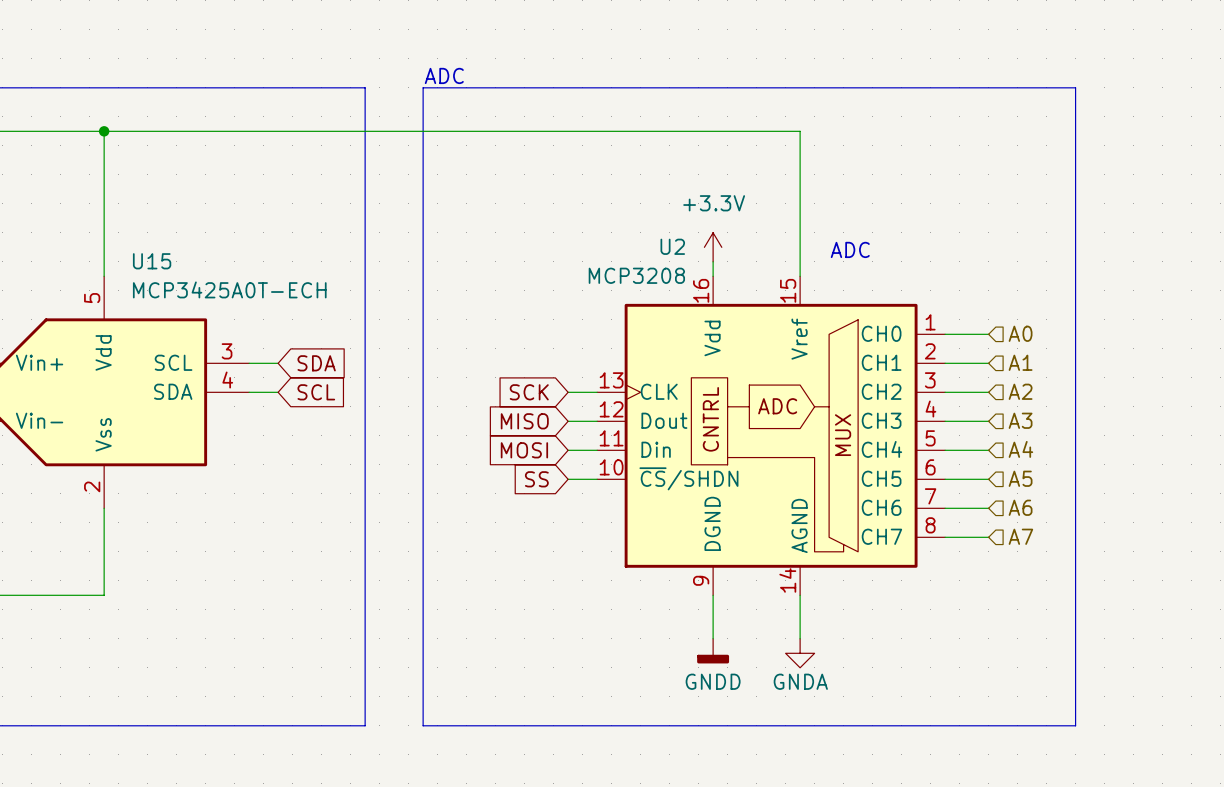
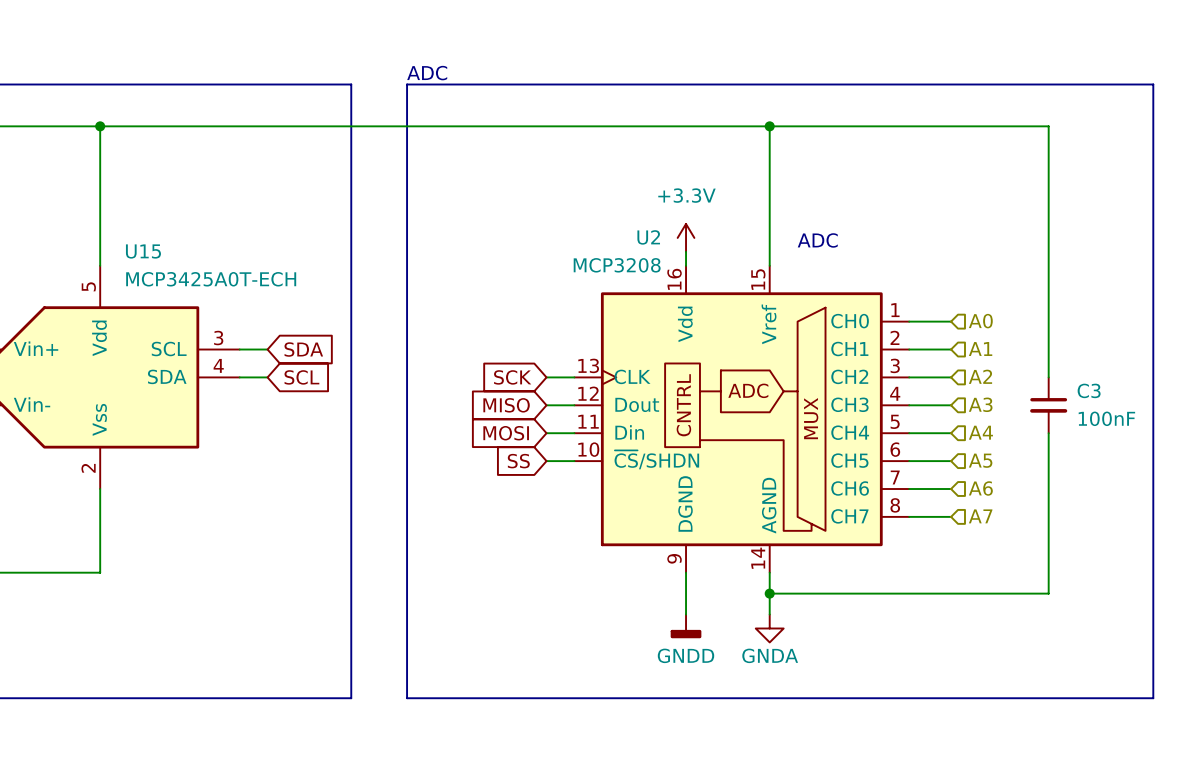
line: (1075, 87) (1075, 725) -> (1034, 84) (1153, 84) (1153, 698) (1034, 698)
wire: none -> (769, 126) (1048, 126) (1048, 377)
junction: none -> (769, 126)
C3: none -> 100nF (1048, 405)
wire: none -> (1048, 433) (1048, 593) (769, 593)
junction: none -> (769, 593)

